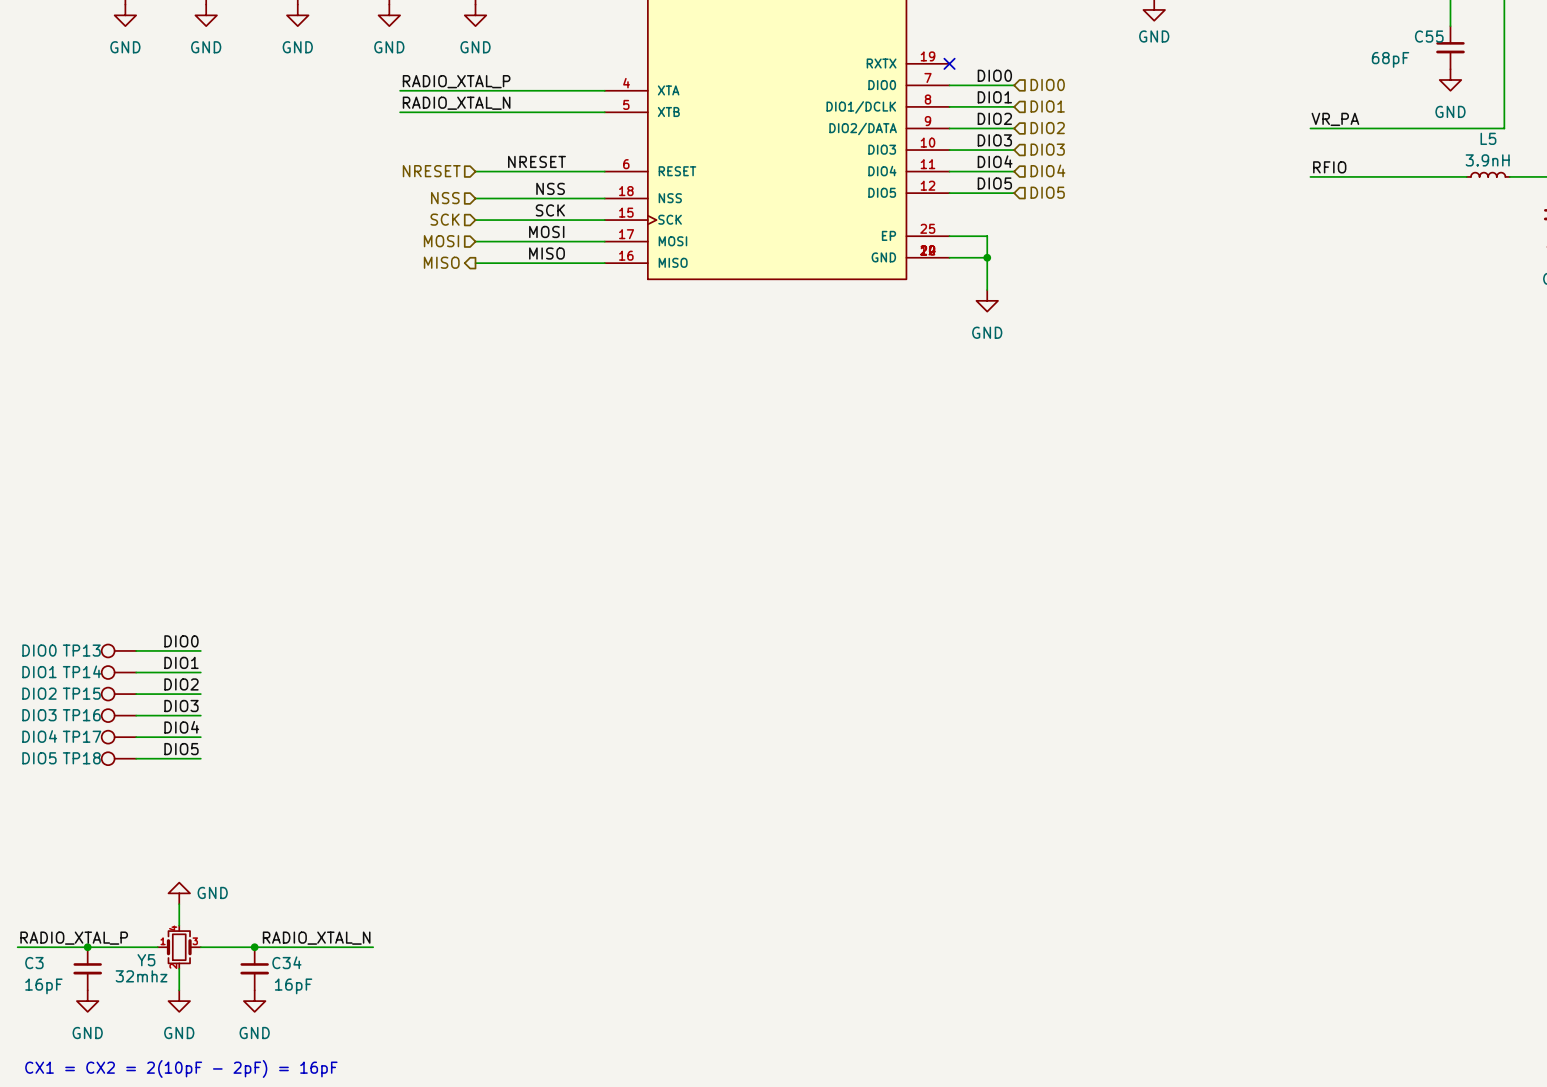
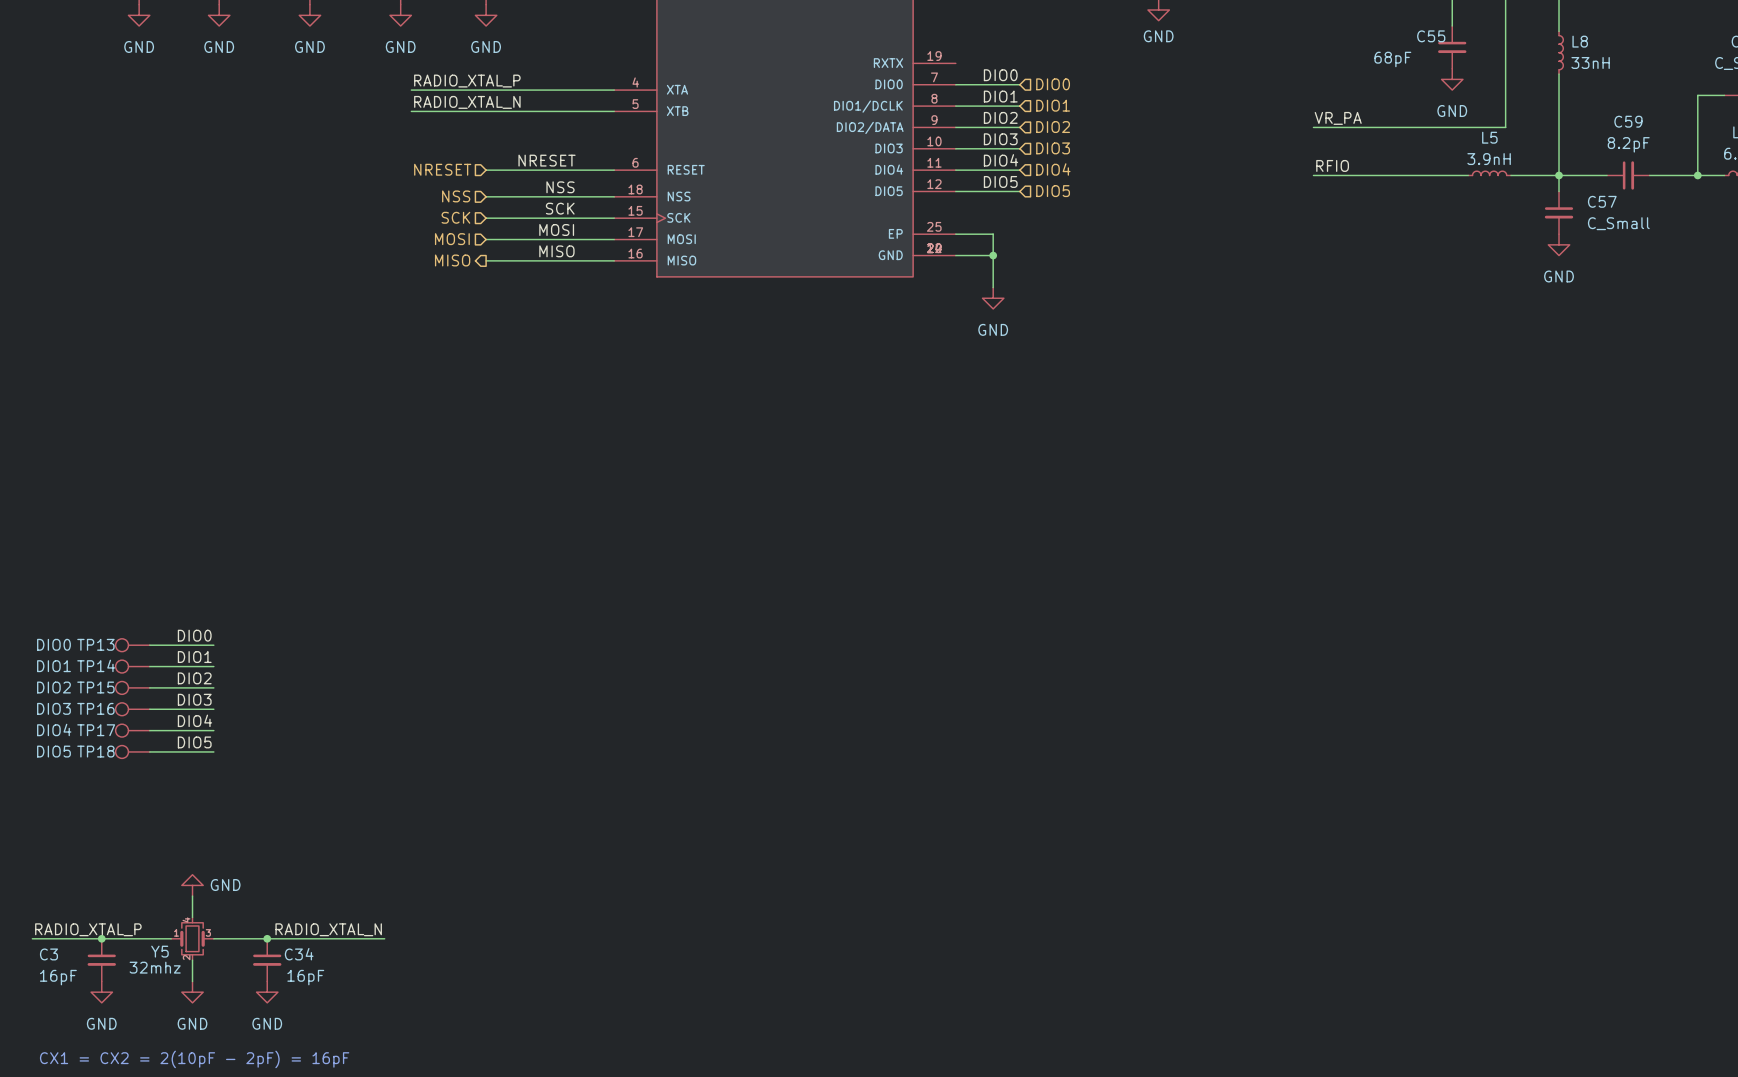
no-connect mark: (949, 63) -> none

